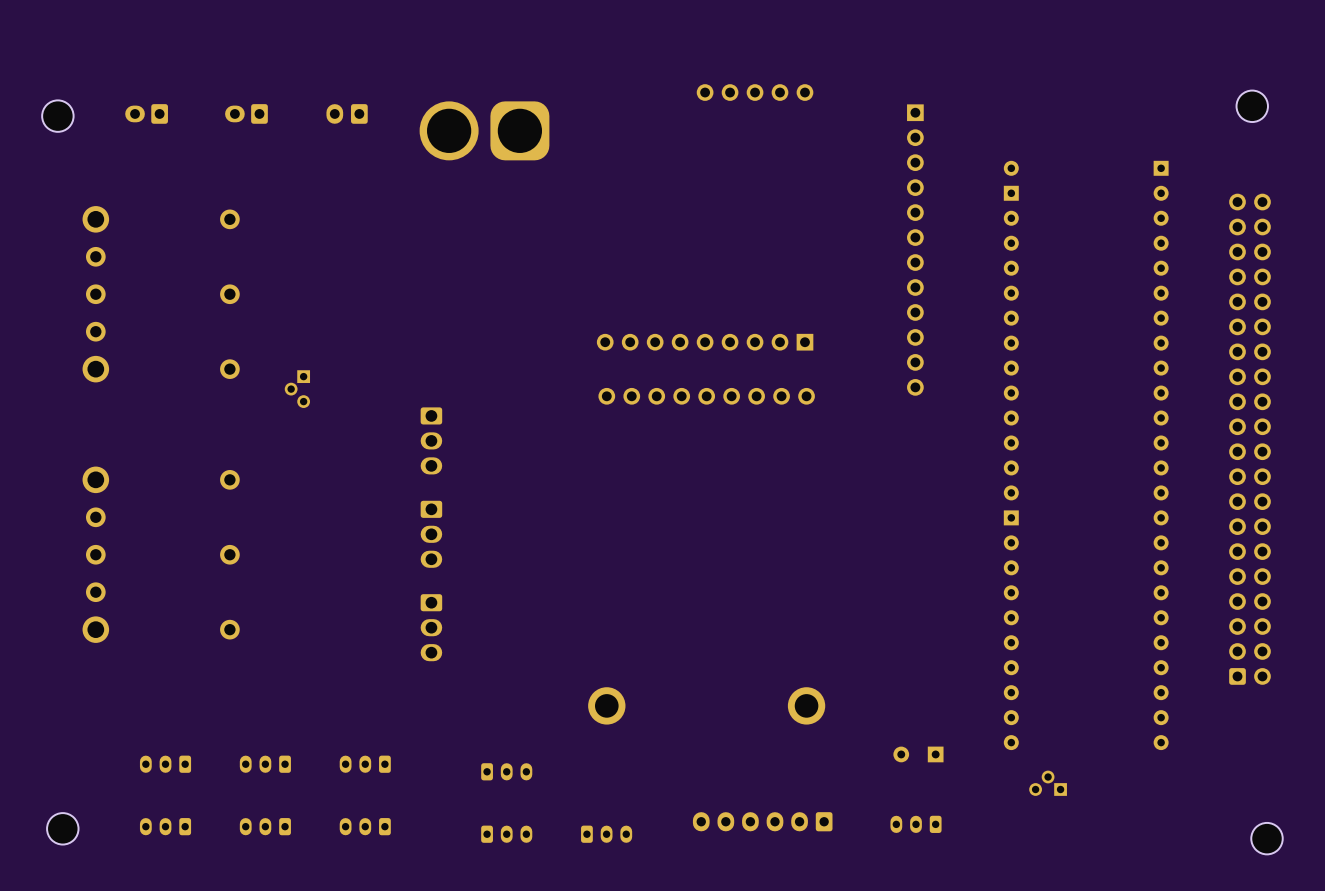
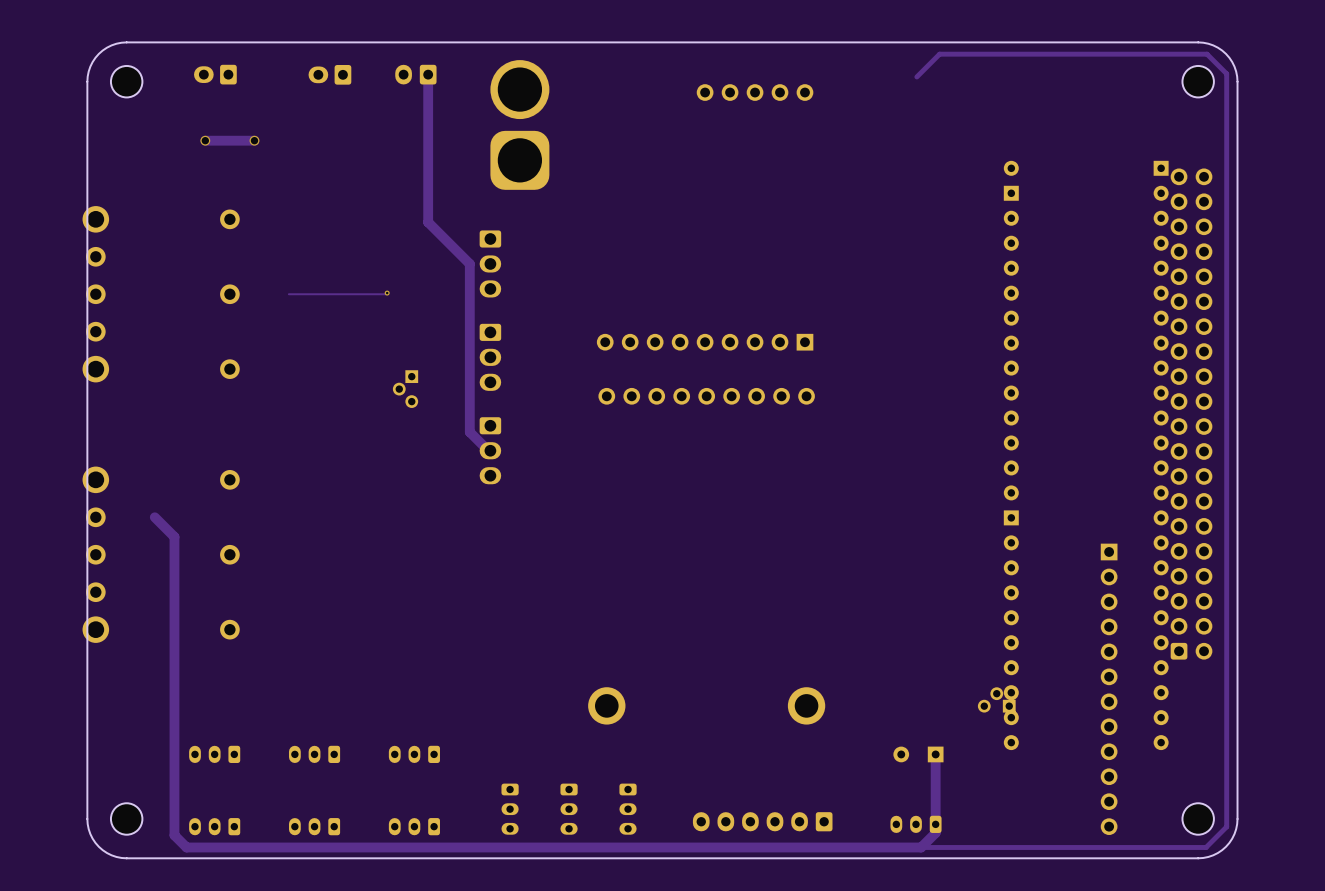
board edge: none -> (1198, 42) (126, 42) (111, 45) (102, 50) (92, 62) (87, 81) (87, 818) (90, 834) (95, 842) (107, 853) (126, 858) (1198, 858) (1213, 855) (1222, 850) (1234, 834) (1237, 818) (1237, 81) (1234, 66) (1225, 53) (1213, 45) (1198, 42)
part: none -> (215, 74)
part: none -> (329, 74)
track: none -> (428, 74) (428, 222) (469, 263) (469, 432) (490, 450)
track: none -> (916, 76) (939, 54) (1207, 54) (1226, 73) (1226, 826) (1206, 847) (921, 847)
part position: (1252, 106) -> (1198, 81)
part: (146, 113) -> none
part: (246, 113) -> none
part position: (347, 113) -> (415, 74)
part position: (57, 116) -> (126, 81)
part rotation: 0° (484, 130) -> 90° clockwise (519, 124)
via: none -> (205, 140)
track: none -> (254, 140) (205, 140)
via: none -> (254, 140)
part: (915, 250) -> none
part: none -> (490, 263)
track: none -> (387, 293) (288, 294)
via: none -> (387, 293)
part: none -> (490, 357)
part position: (297, 389) -> (405, 389)
part position: (1249, 439) -> (1191, 414)
part: (431, 440) -> none
part: none -> (490, 450)
track: none -> (154, 517) (174, 536) (174, 835) (186, 847) (921, 847)
part: (431, 534) -> none
part: (431, 627) -> none
part: none -> (1109, 689)
part: none -> (214, 754)
part: none -> (314, 754)
part: none -> (414, 754)
track: none -> (935, 754) (935, 832) (921, 847)
part: (165, 764) -> none
part: (265, 764) -> none
part: (365, 764) -> none
part: (506, 771) -> none
part position: (1048, 783) -> (996, 699)
part: none -> (510, 809)
part: none -> (569, 809)
part: none -> (628, 809)
part: (165, 826) -> none
part: none -> (214, 826)
part: (265, 826) -> none
part: none -> (314, 826)
part: (365, 826) -> none
part: none -> (414, 826)
part position: (62, 828) -> (126, 818)
part: (506, 834) -> none
part: (606, 834) -> none
part position: (1267, 838) -> (1198, 818)

